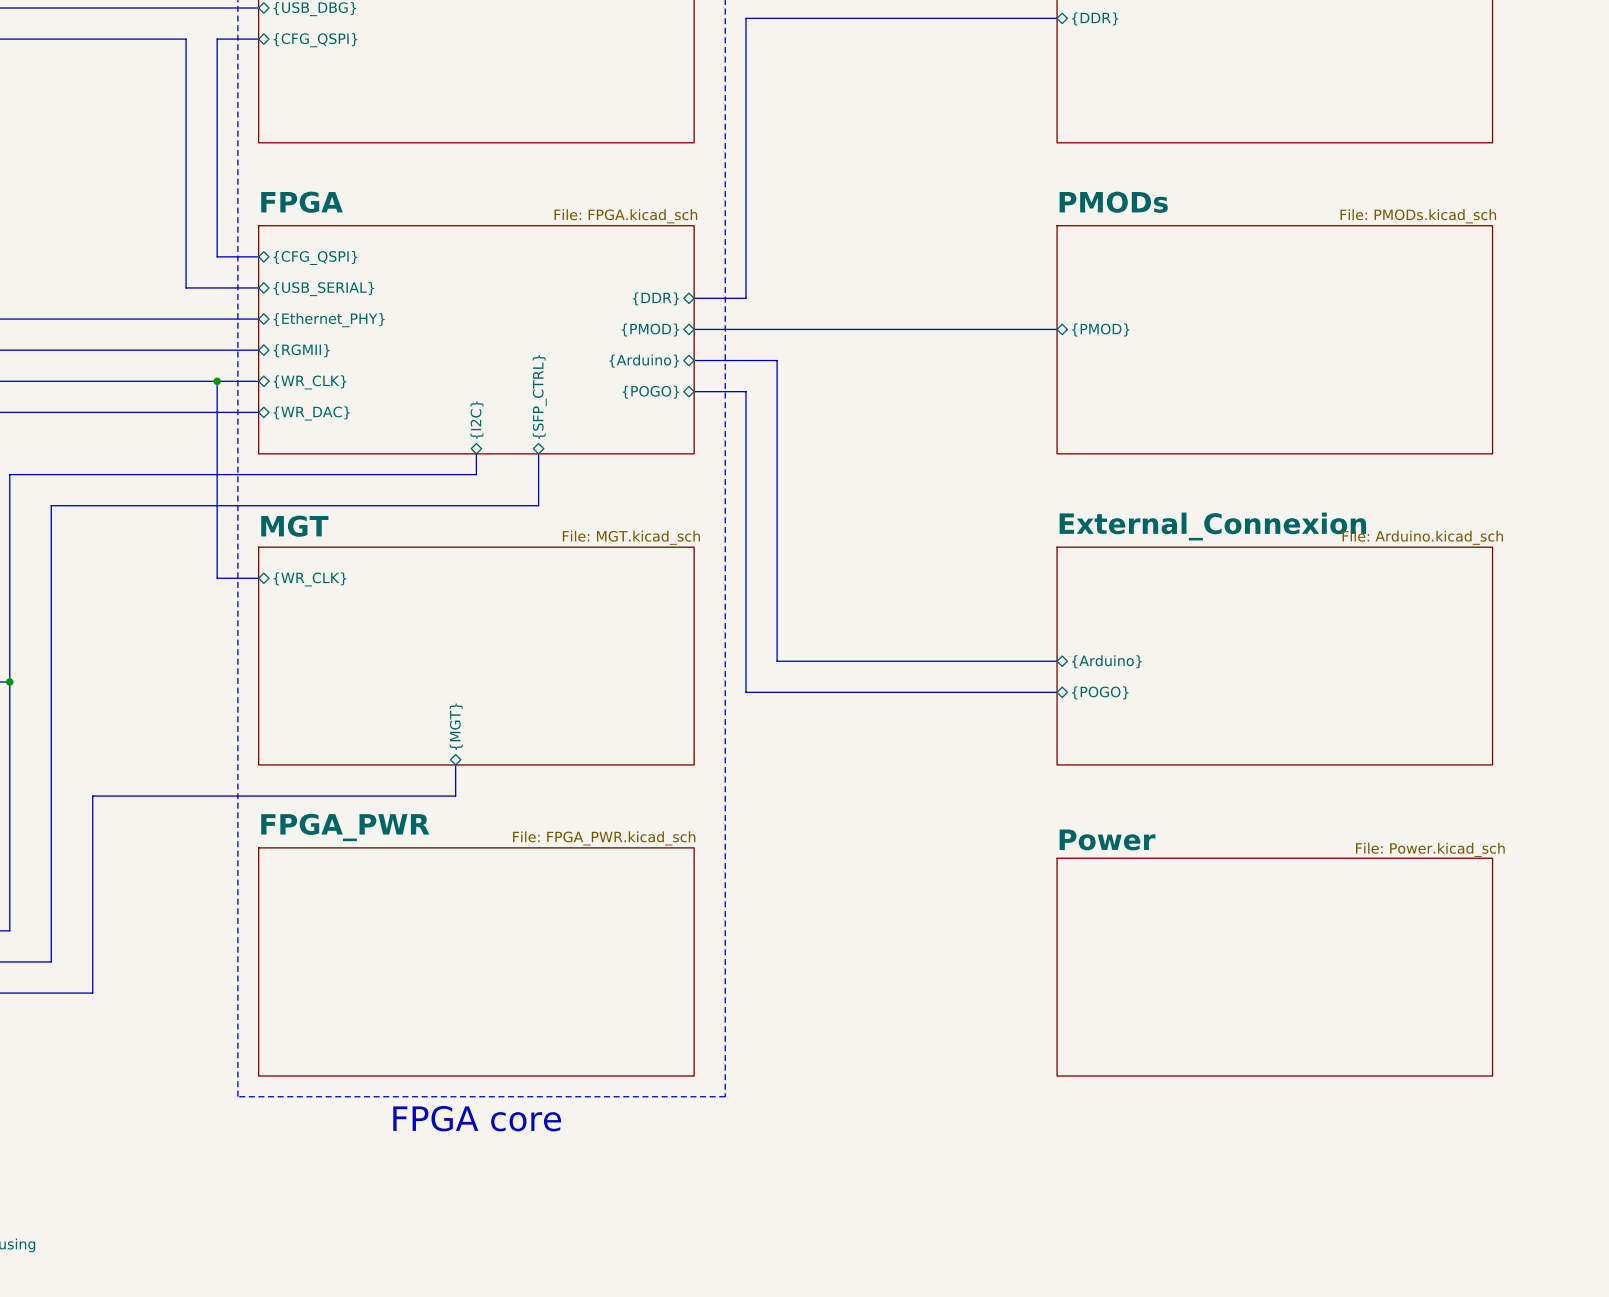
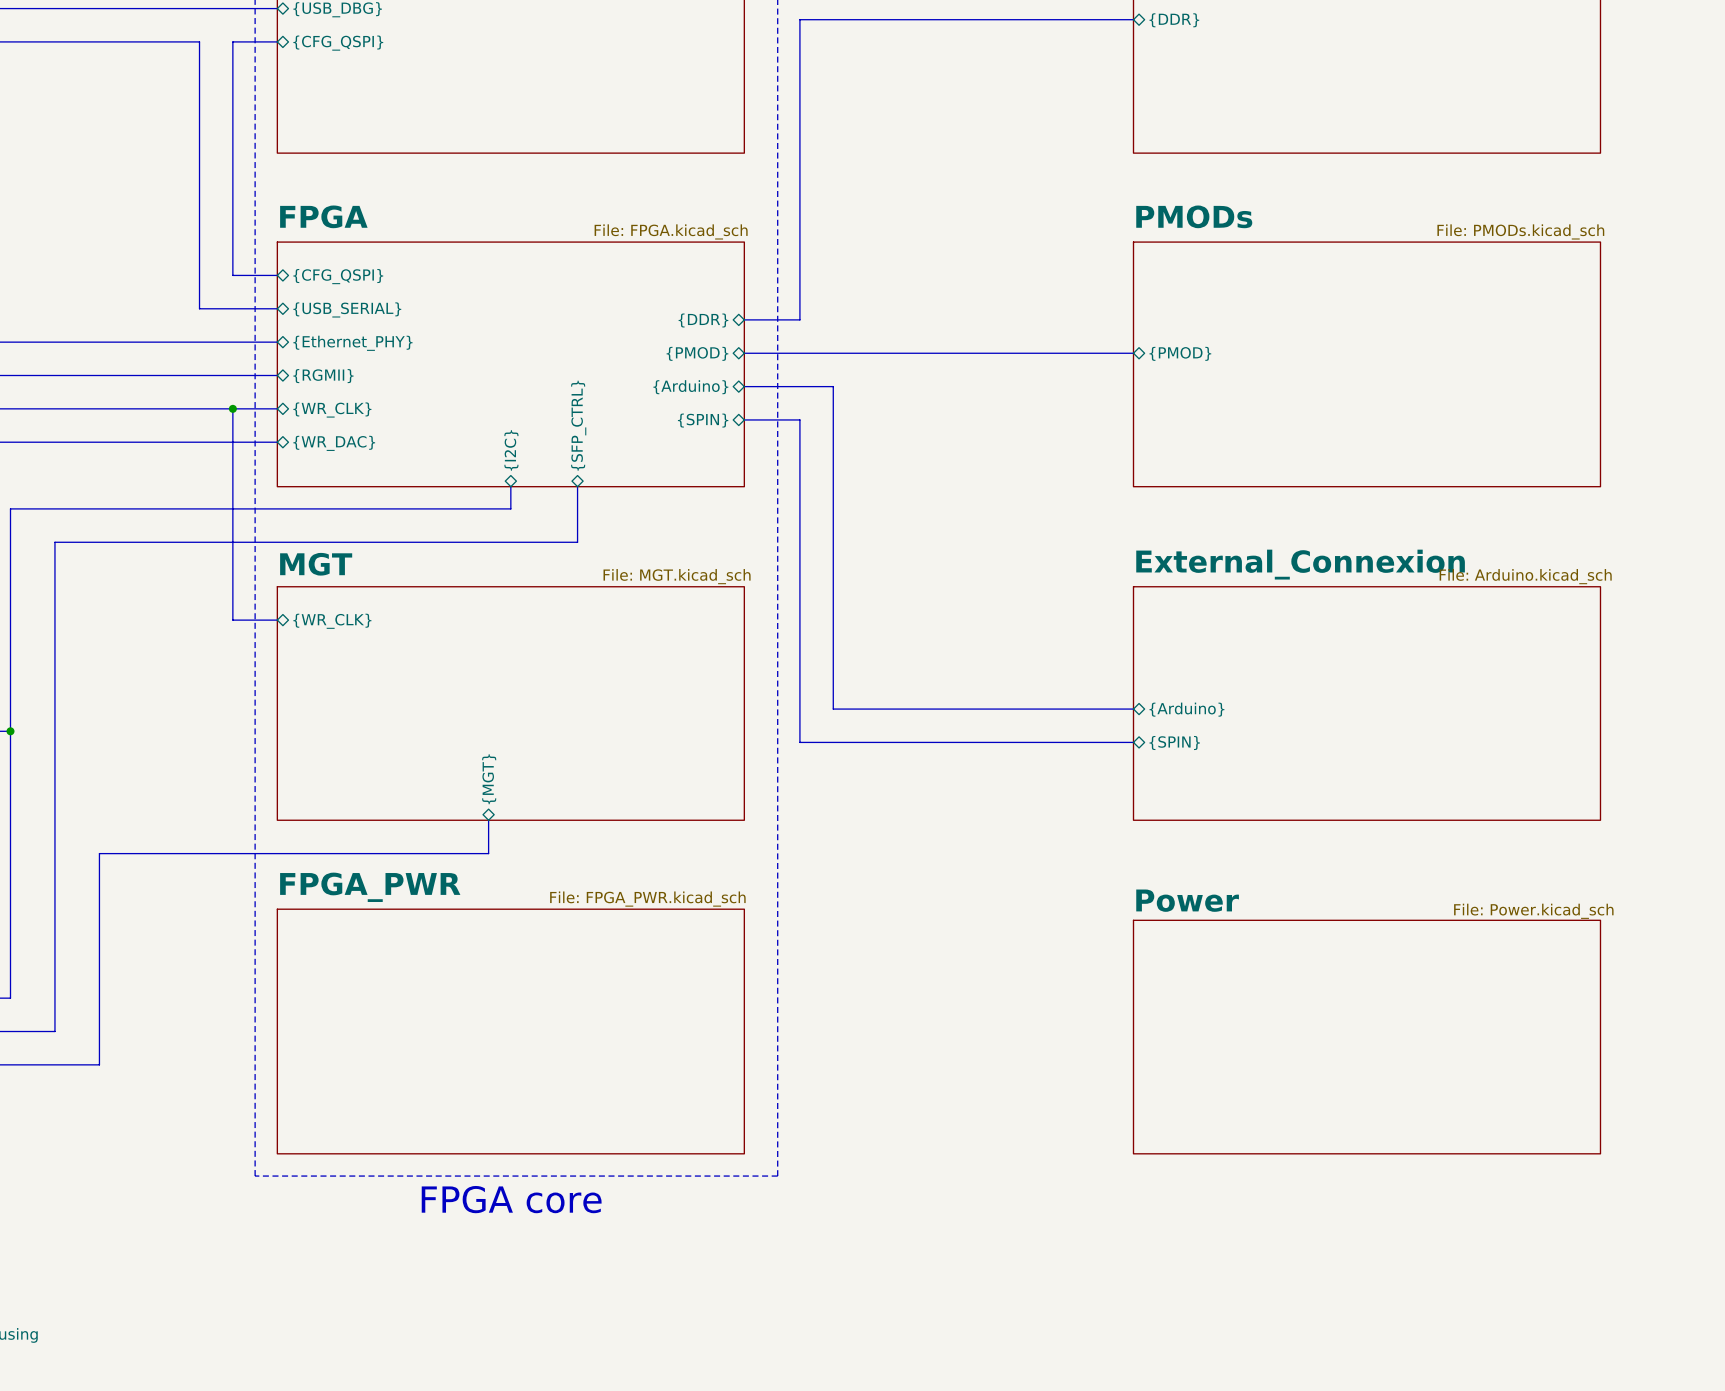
sheet pin: {POGO} (650, 392) -> {SPIN} (703, 420)
sheet pin: {POGO} (1100, 692) -> {SPIN} (1174, 743)

